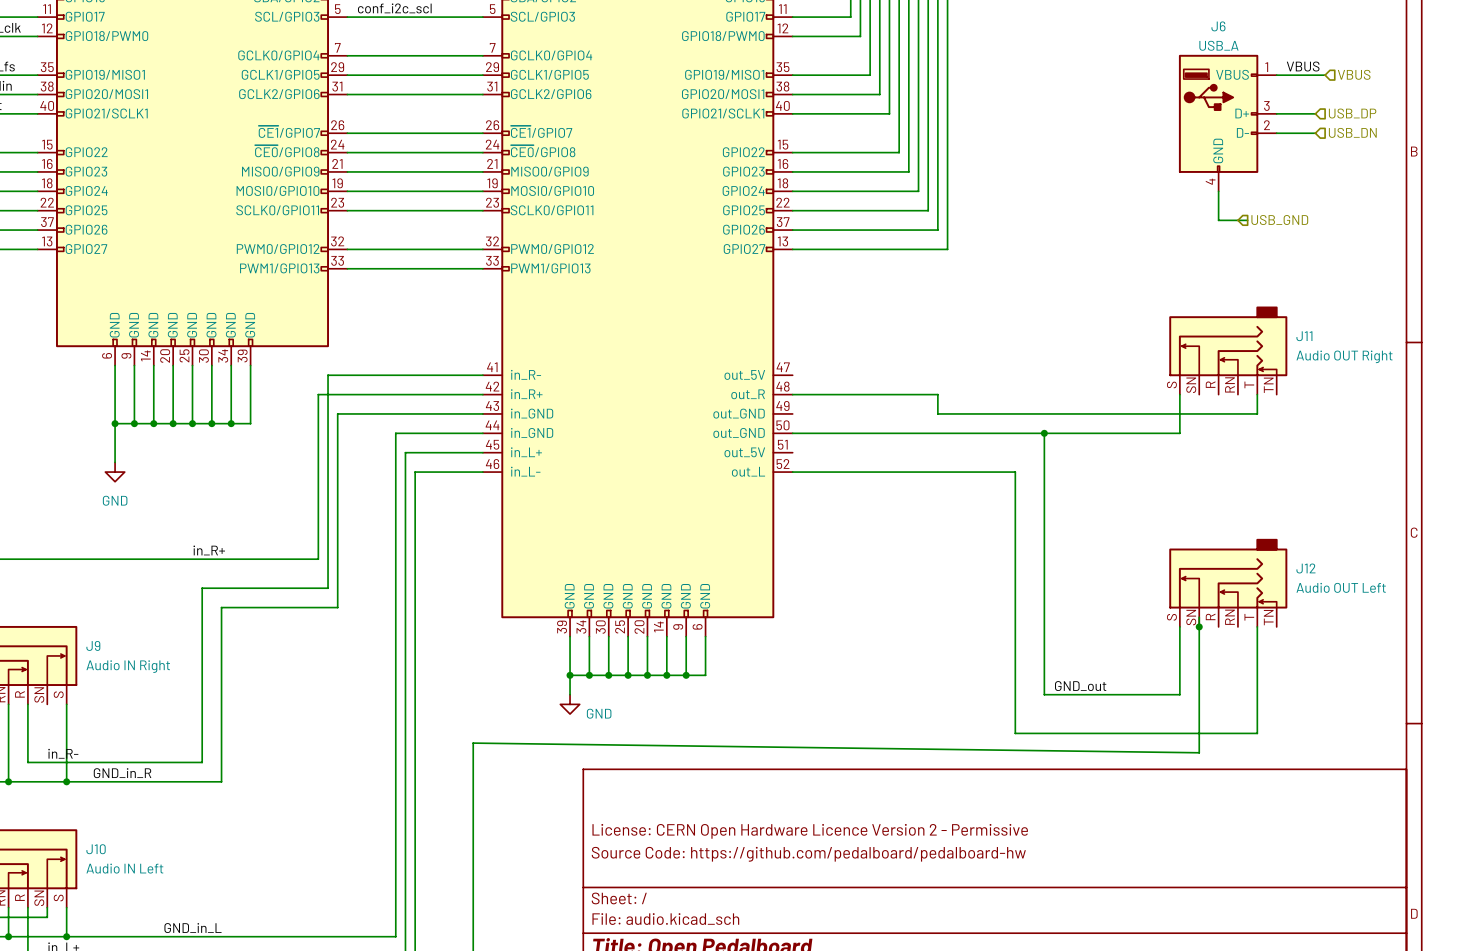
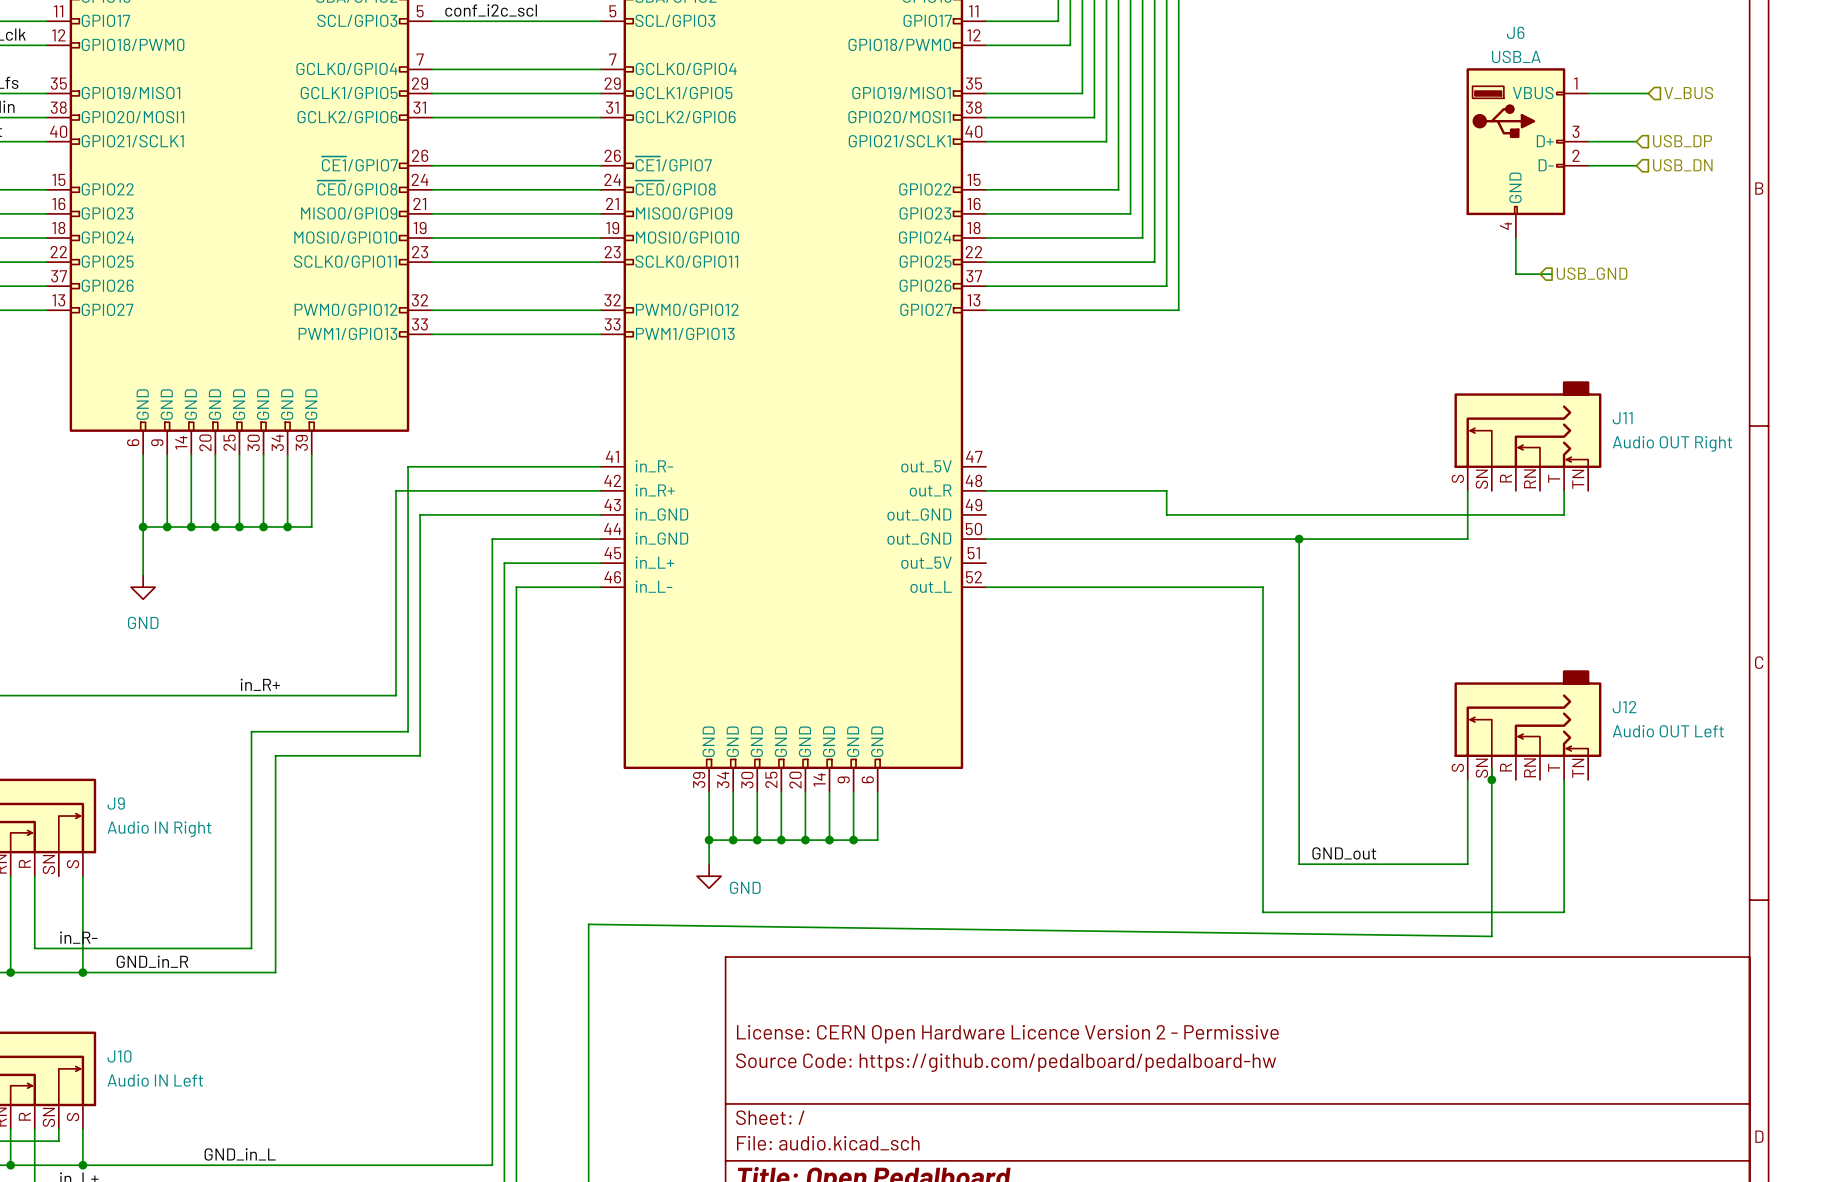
label: VBUS (1303, 66) -> none
hierarchical label: VBUS (1354, 74) -> V_BUS (1688, 93)

